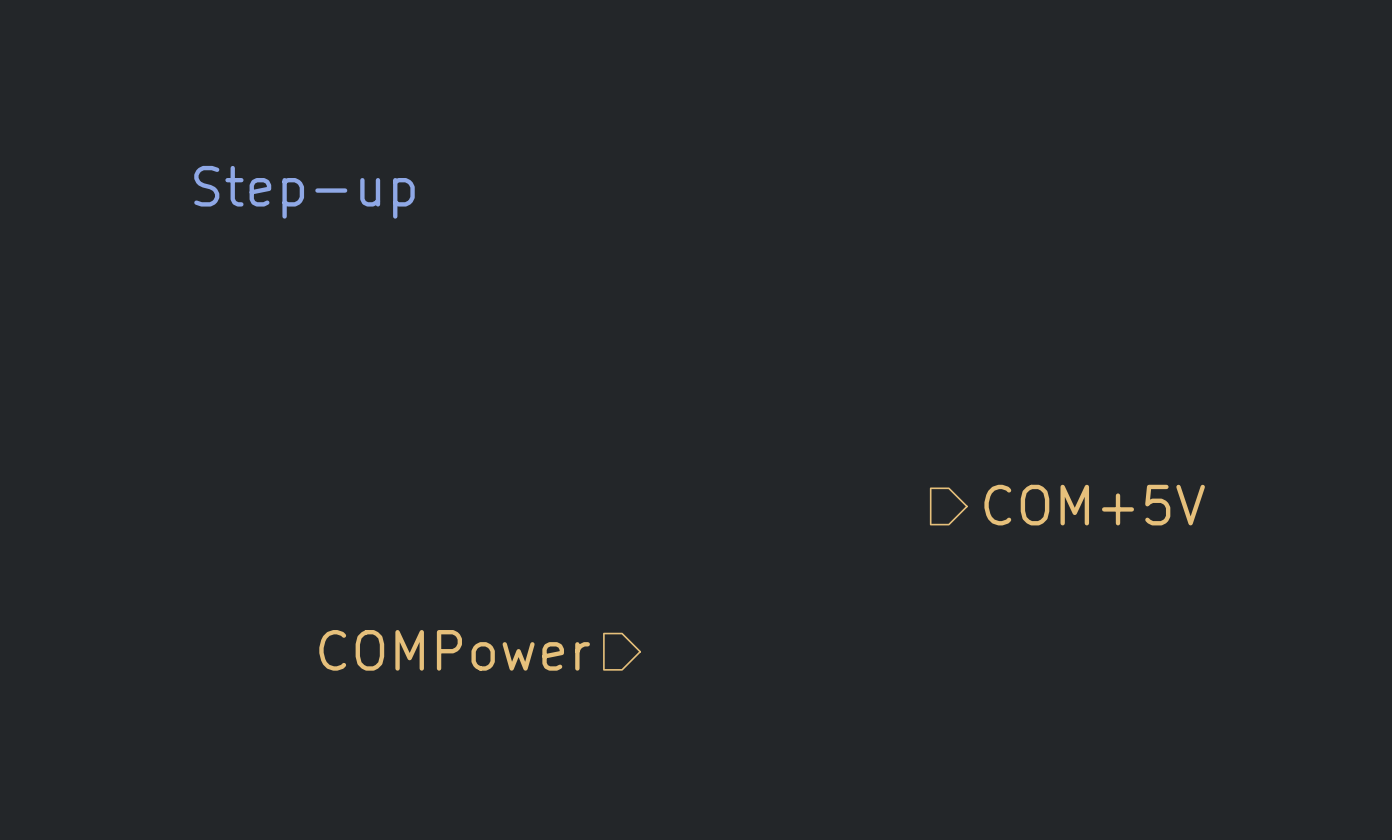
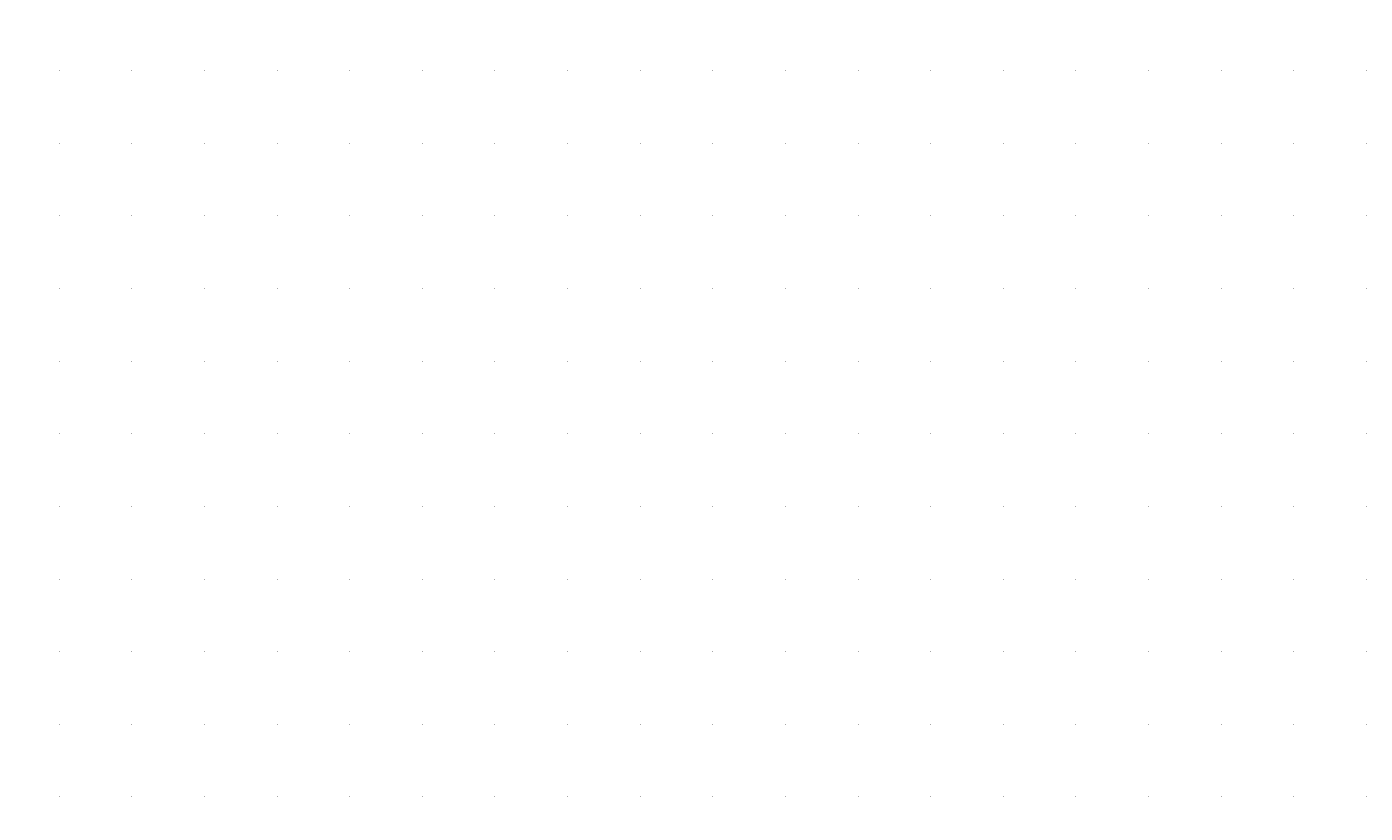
text: Step-up (304, 192) -> none
hierarchical label: COM+5V (1094, 505) -> none
hierarchical label: COMPower (454, 650) -> none

